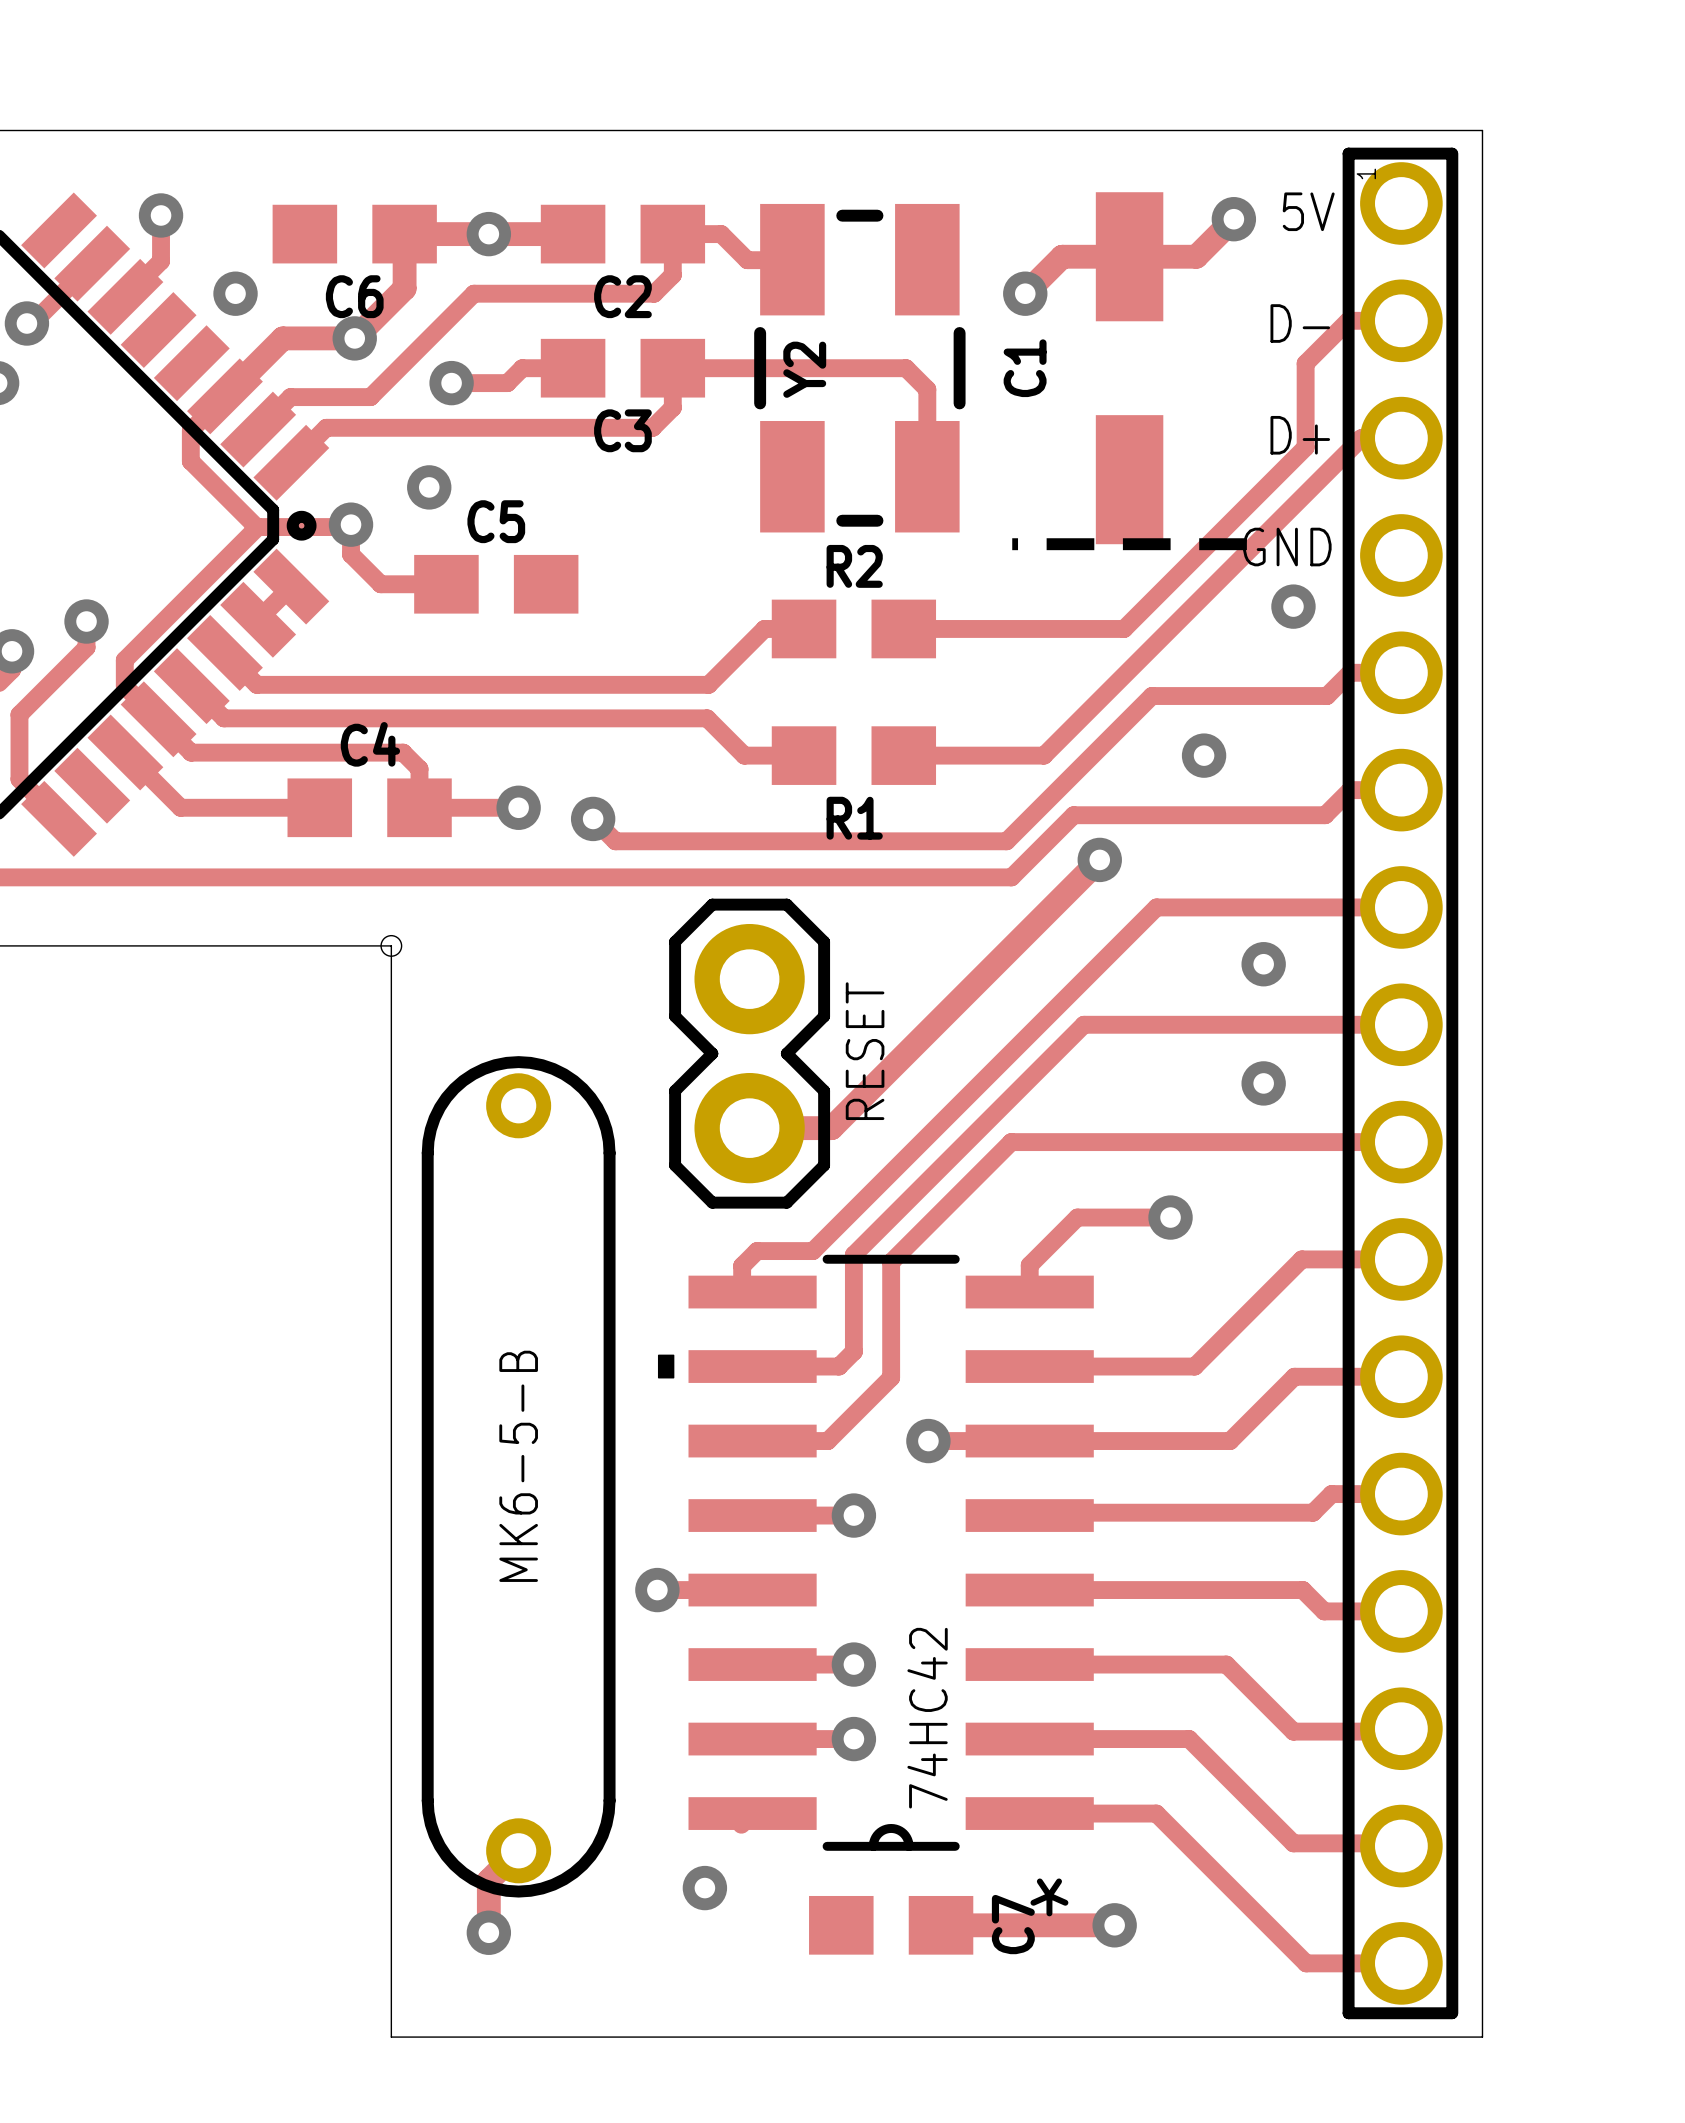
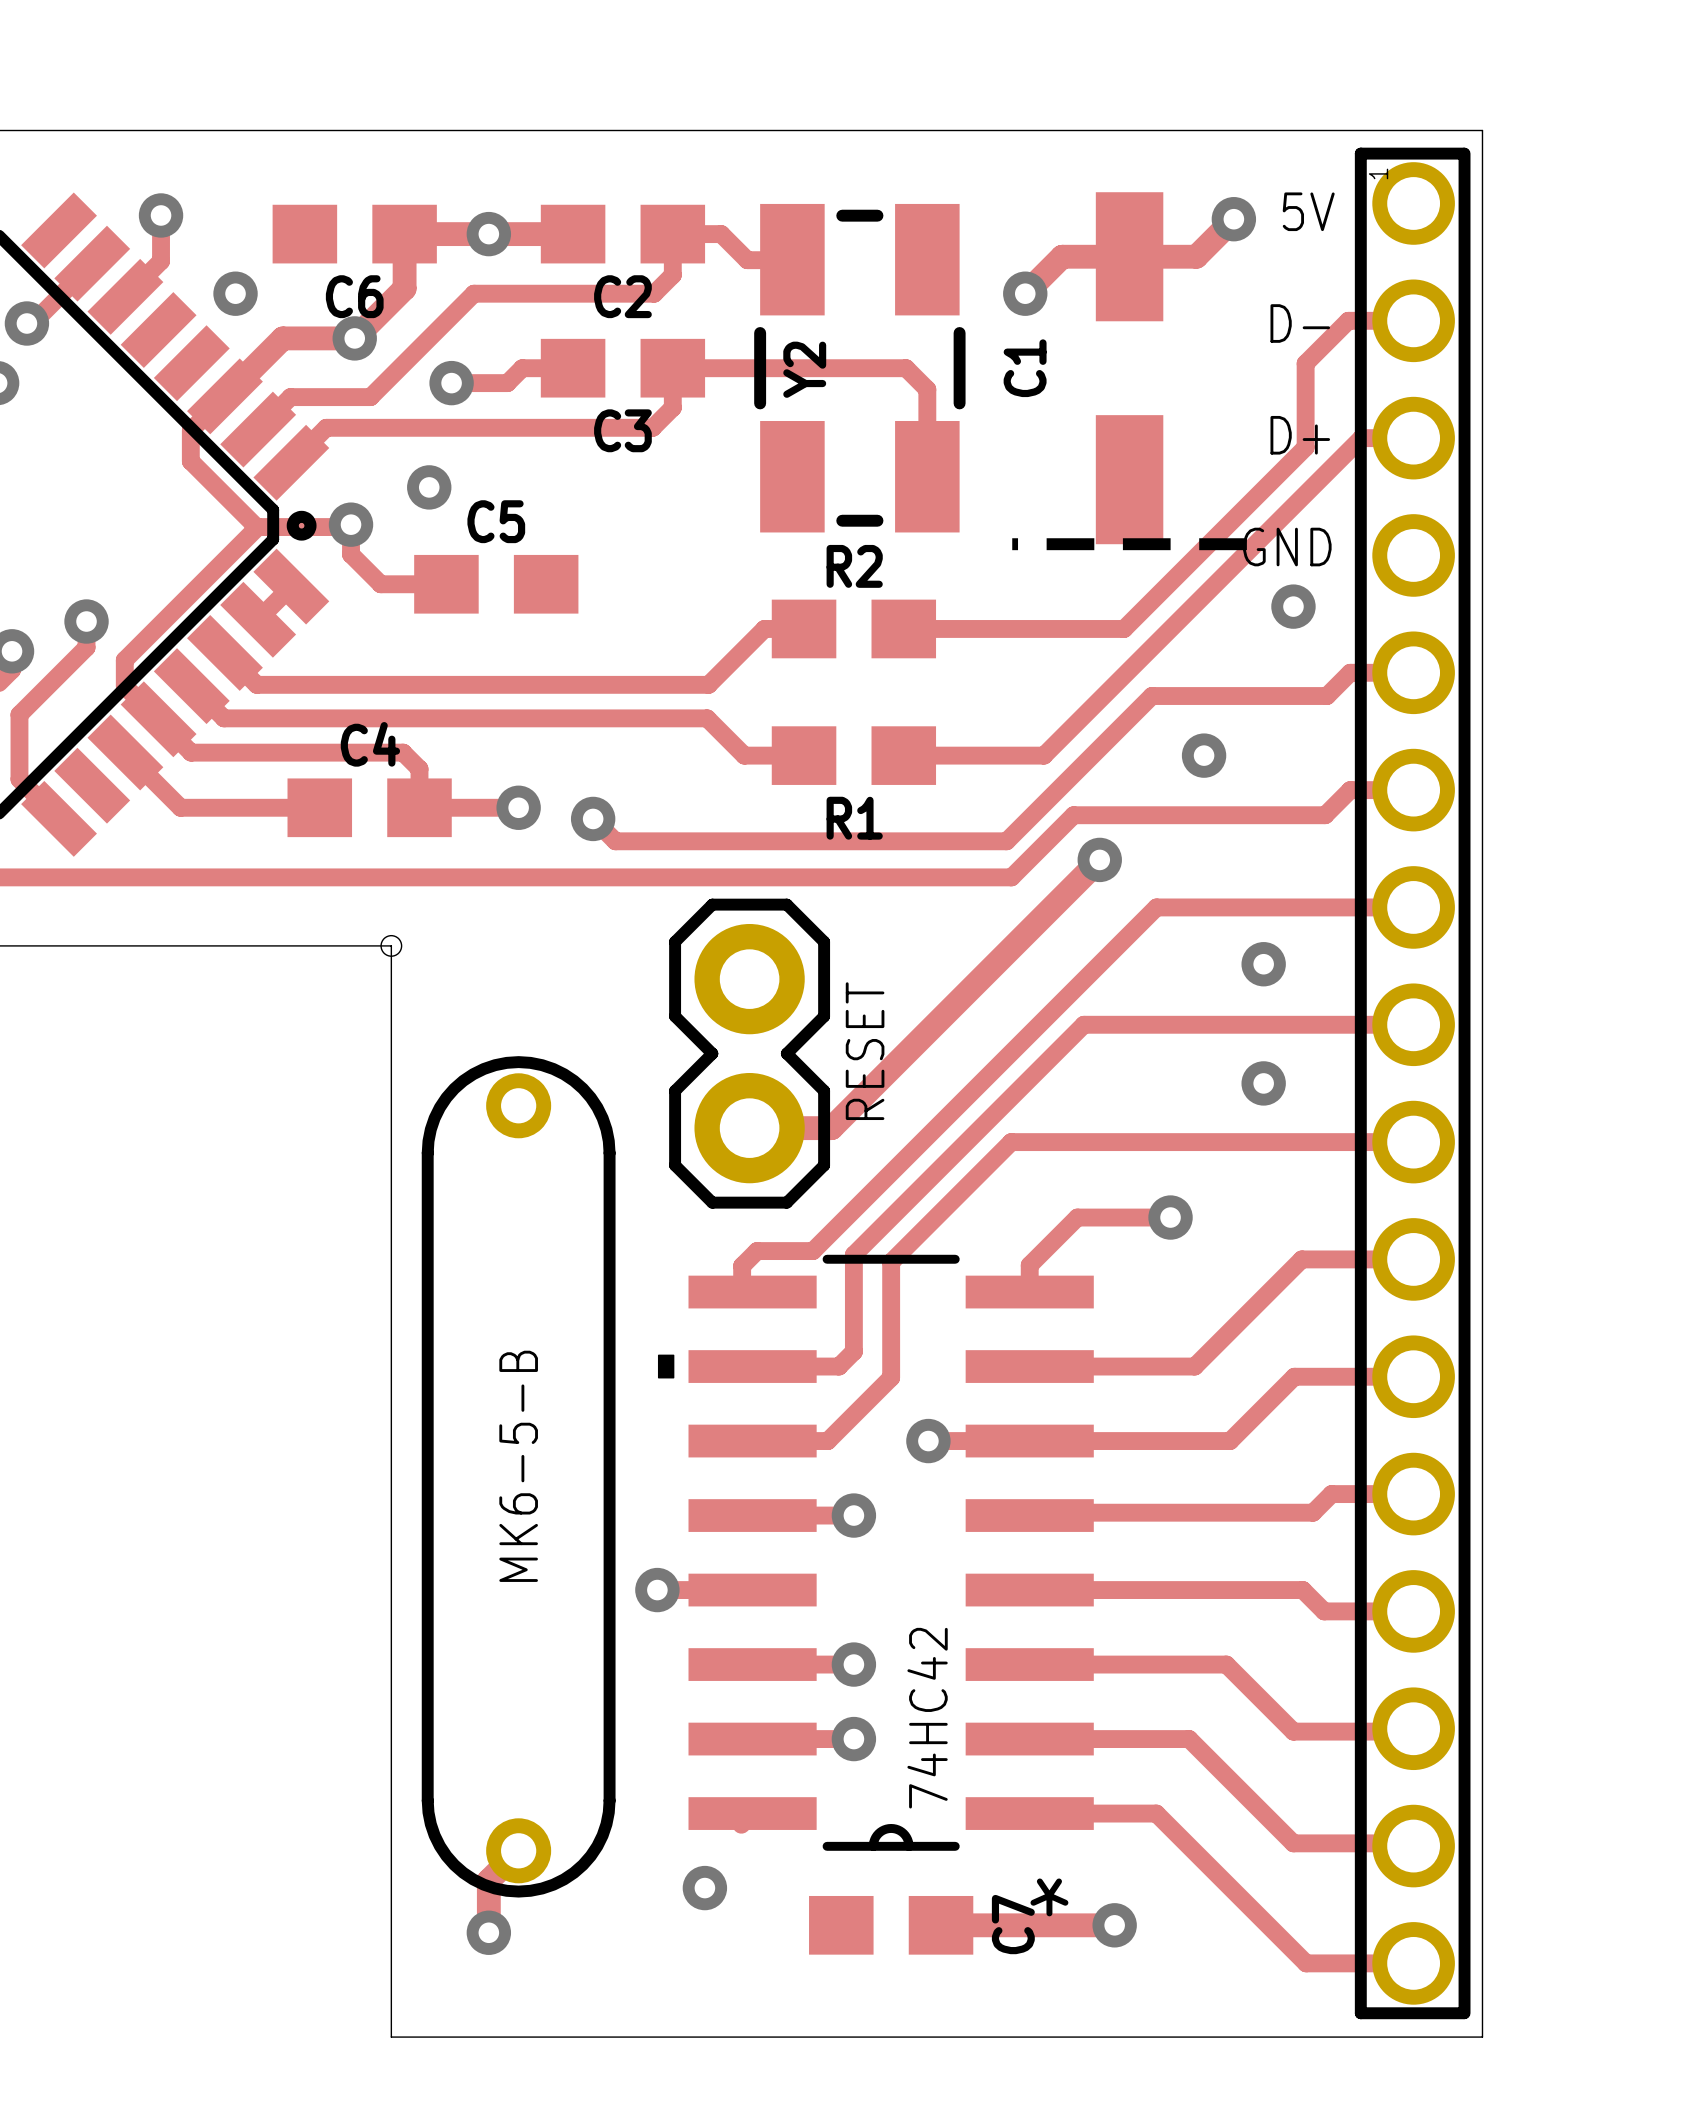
part position: (1400, 1083) -> (1412, 1083)

